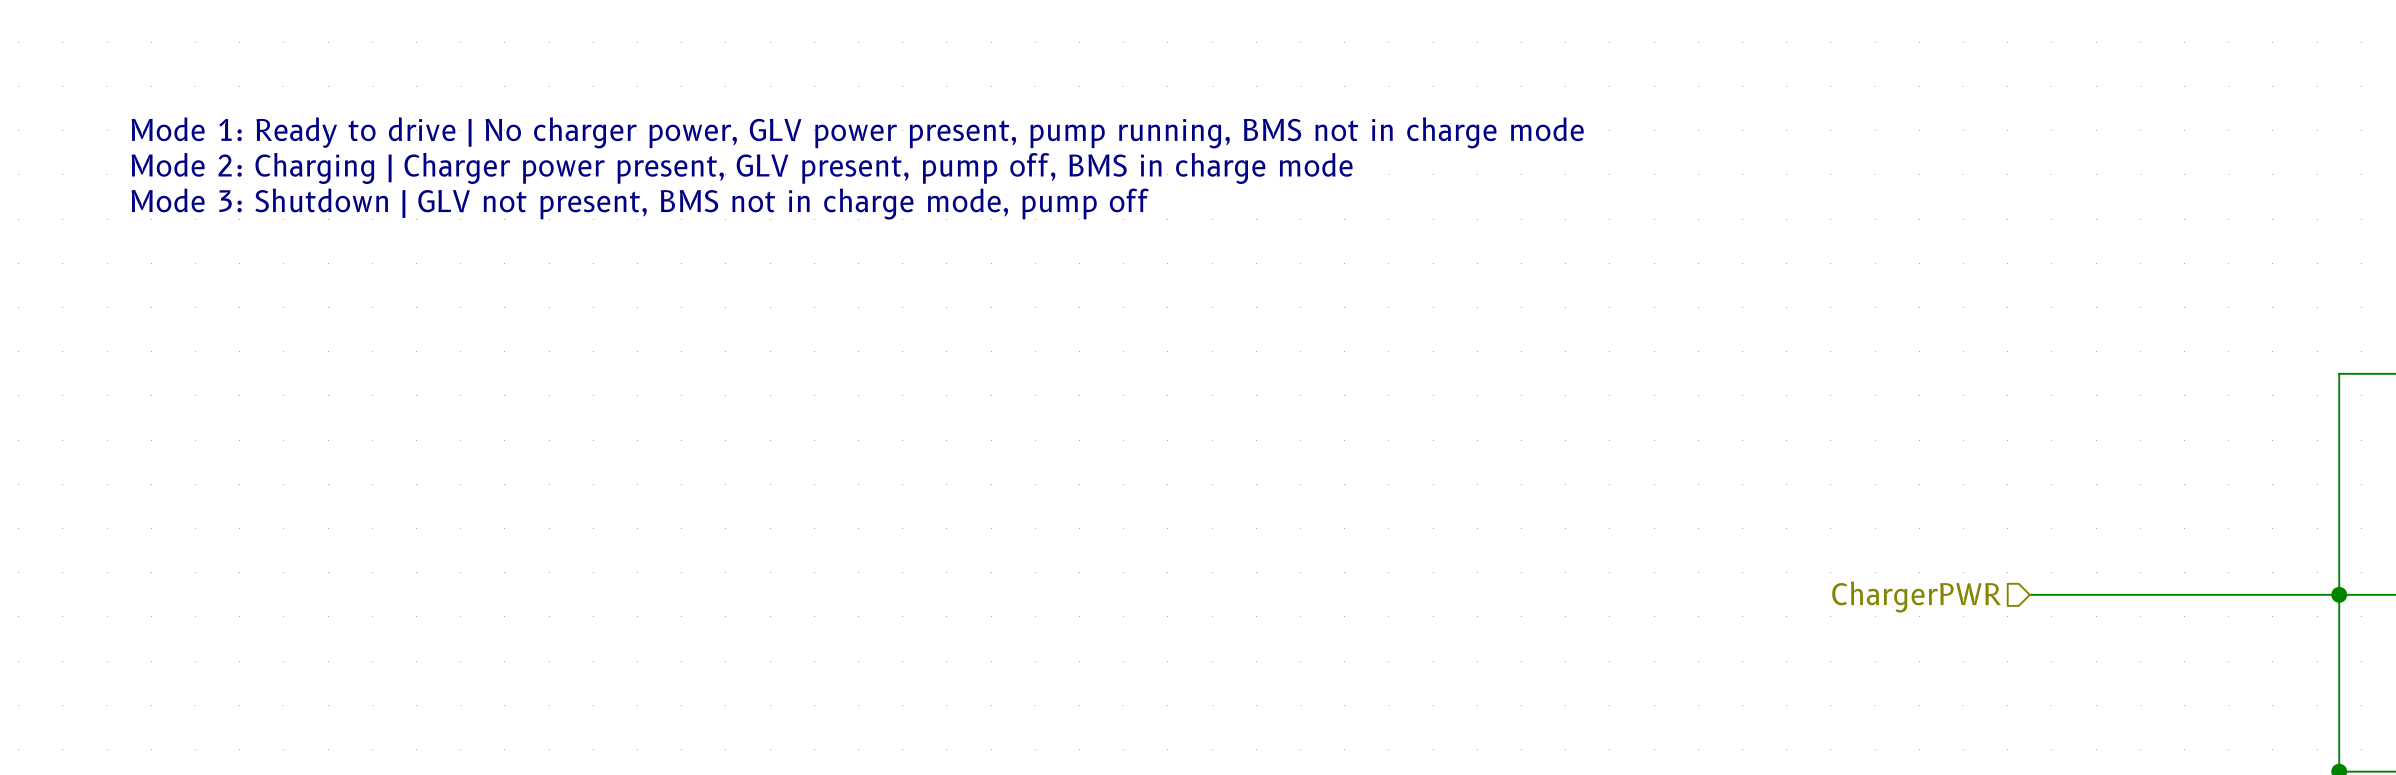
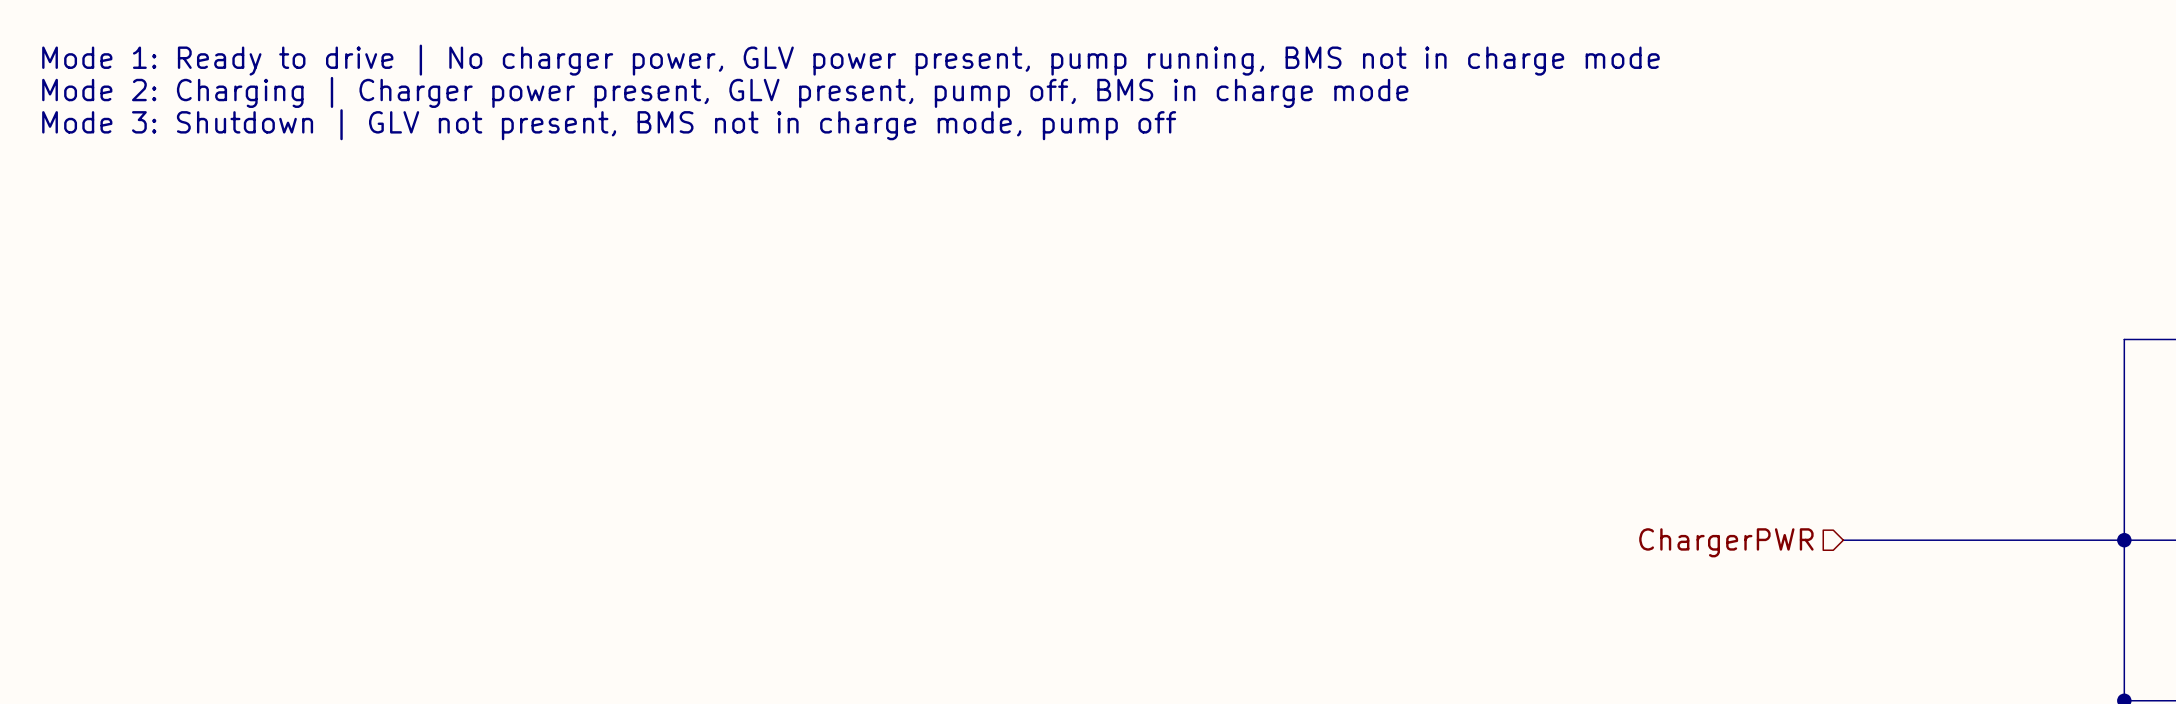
text position: Mode 1: Ready to drive | No charger power, GLV power present, pump running, BMS not in charge mode (857, 132) -> Mode 1: Ready to drive | No charger power, GLV power present, pump running, BMS not in charge mode (850, 60)
text position: Mode 2: Charging | Charger power present, GLV present, pump off, BMS in charge mode (742, 168) -> Mode 2: Charging | Charger power present, GLV present, pump off, BMS in charge mode (725, 92)
text position: Mode 3: Shutdown | GLV not present, BMS not in charge mode, pump off (640, 204) -> Mode 3: Shutdown | GLV not present, BMS not in charge mode, pump off (609, 124)

